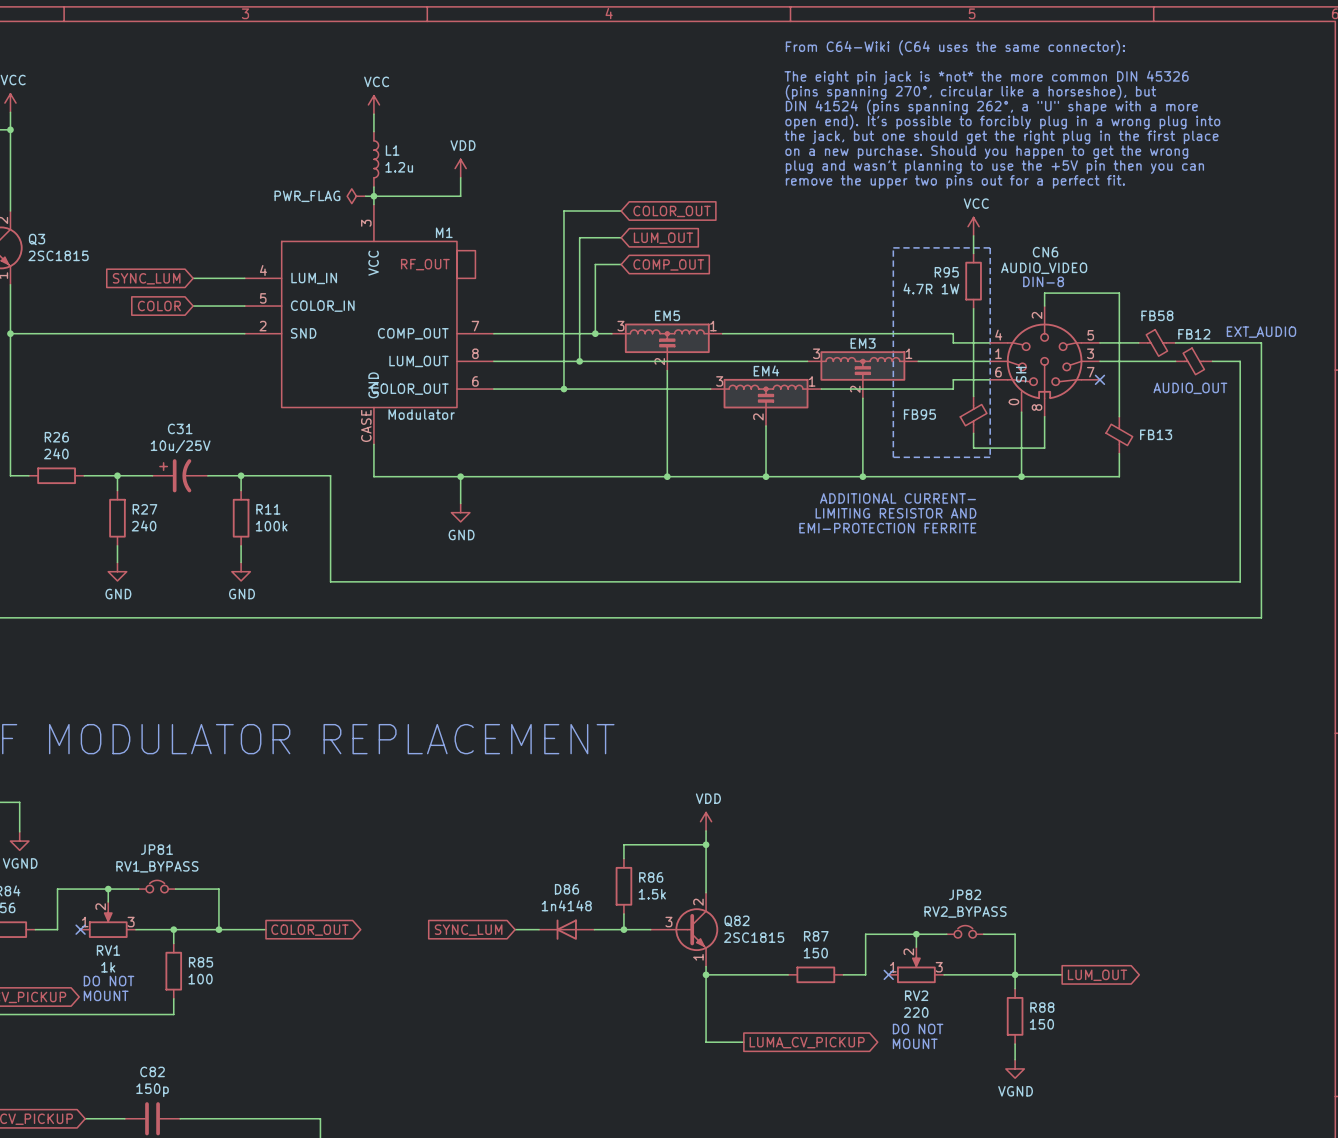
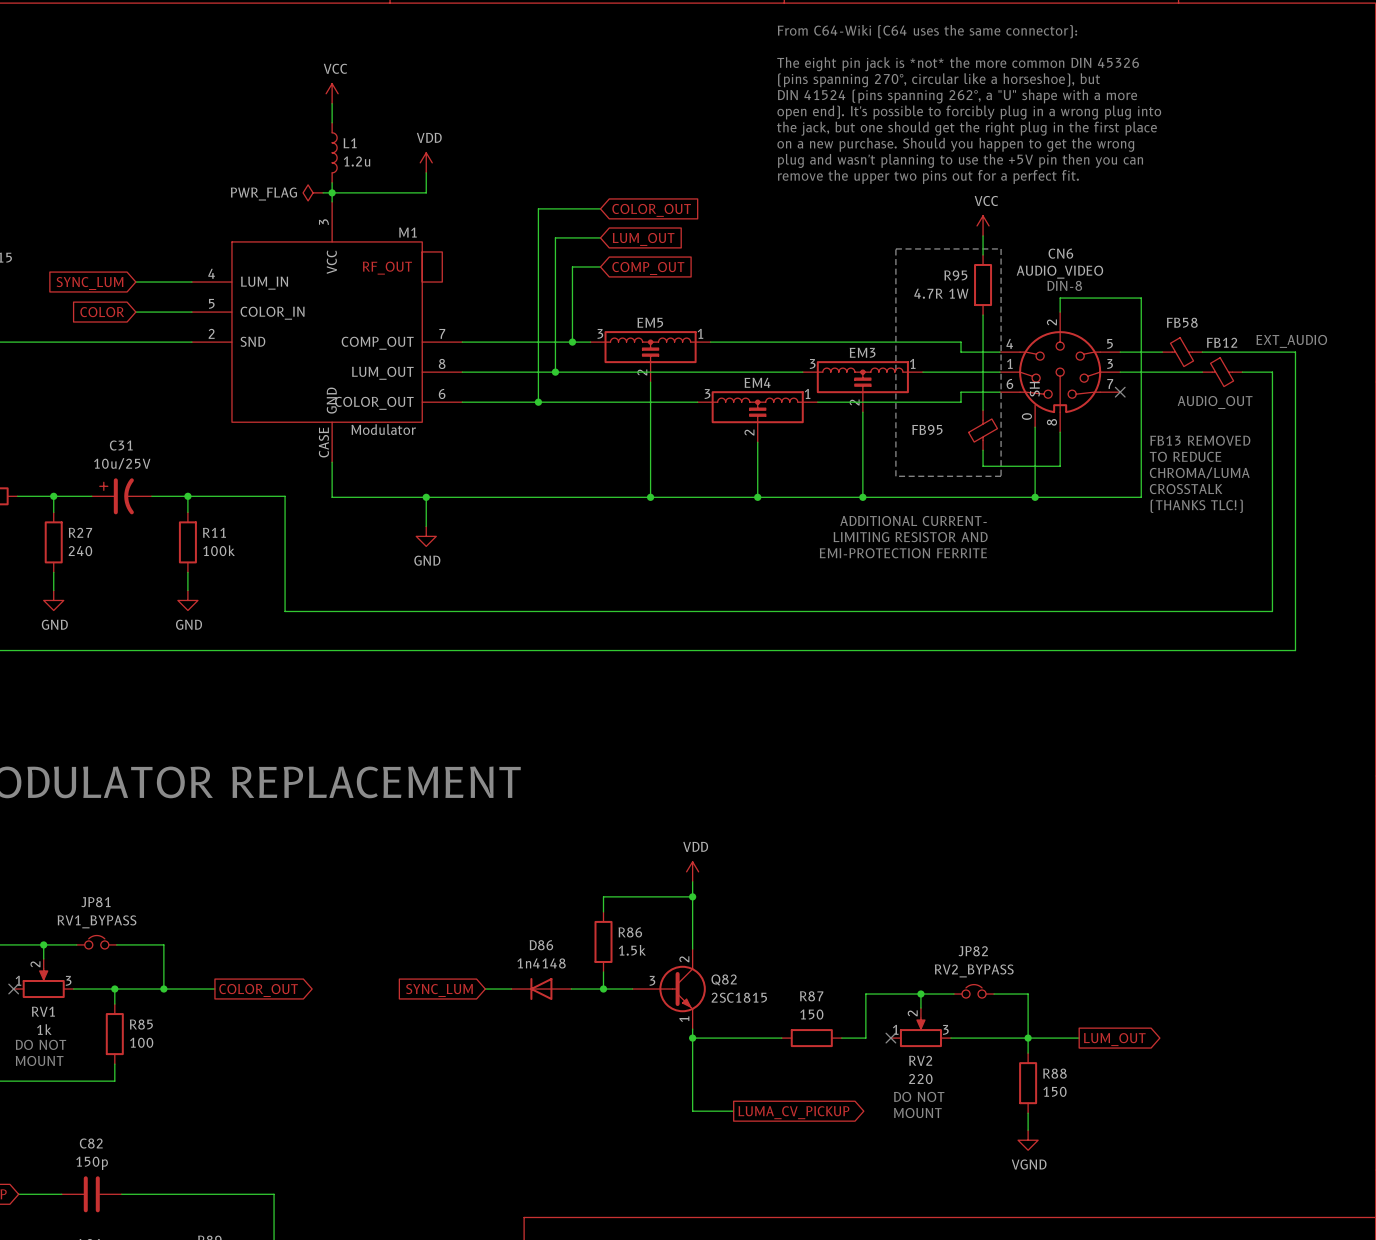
text: none -> FB13 REMOVED (1200, 440)
FB13: (1119, 435) -> none
text: none -> TO REDUCE (1185, 456)
text: none -> CHROMA/LUMA (1199, 472)
text: none -> CROSSTALK (1186, 489)
text: none -> (THANKS TLC!) (1196, 506)

